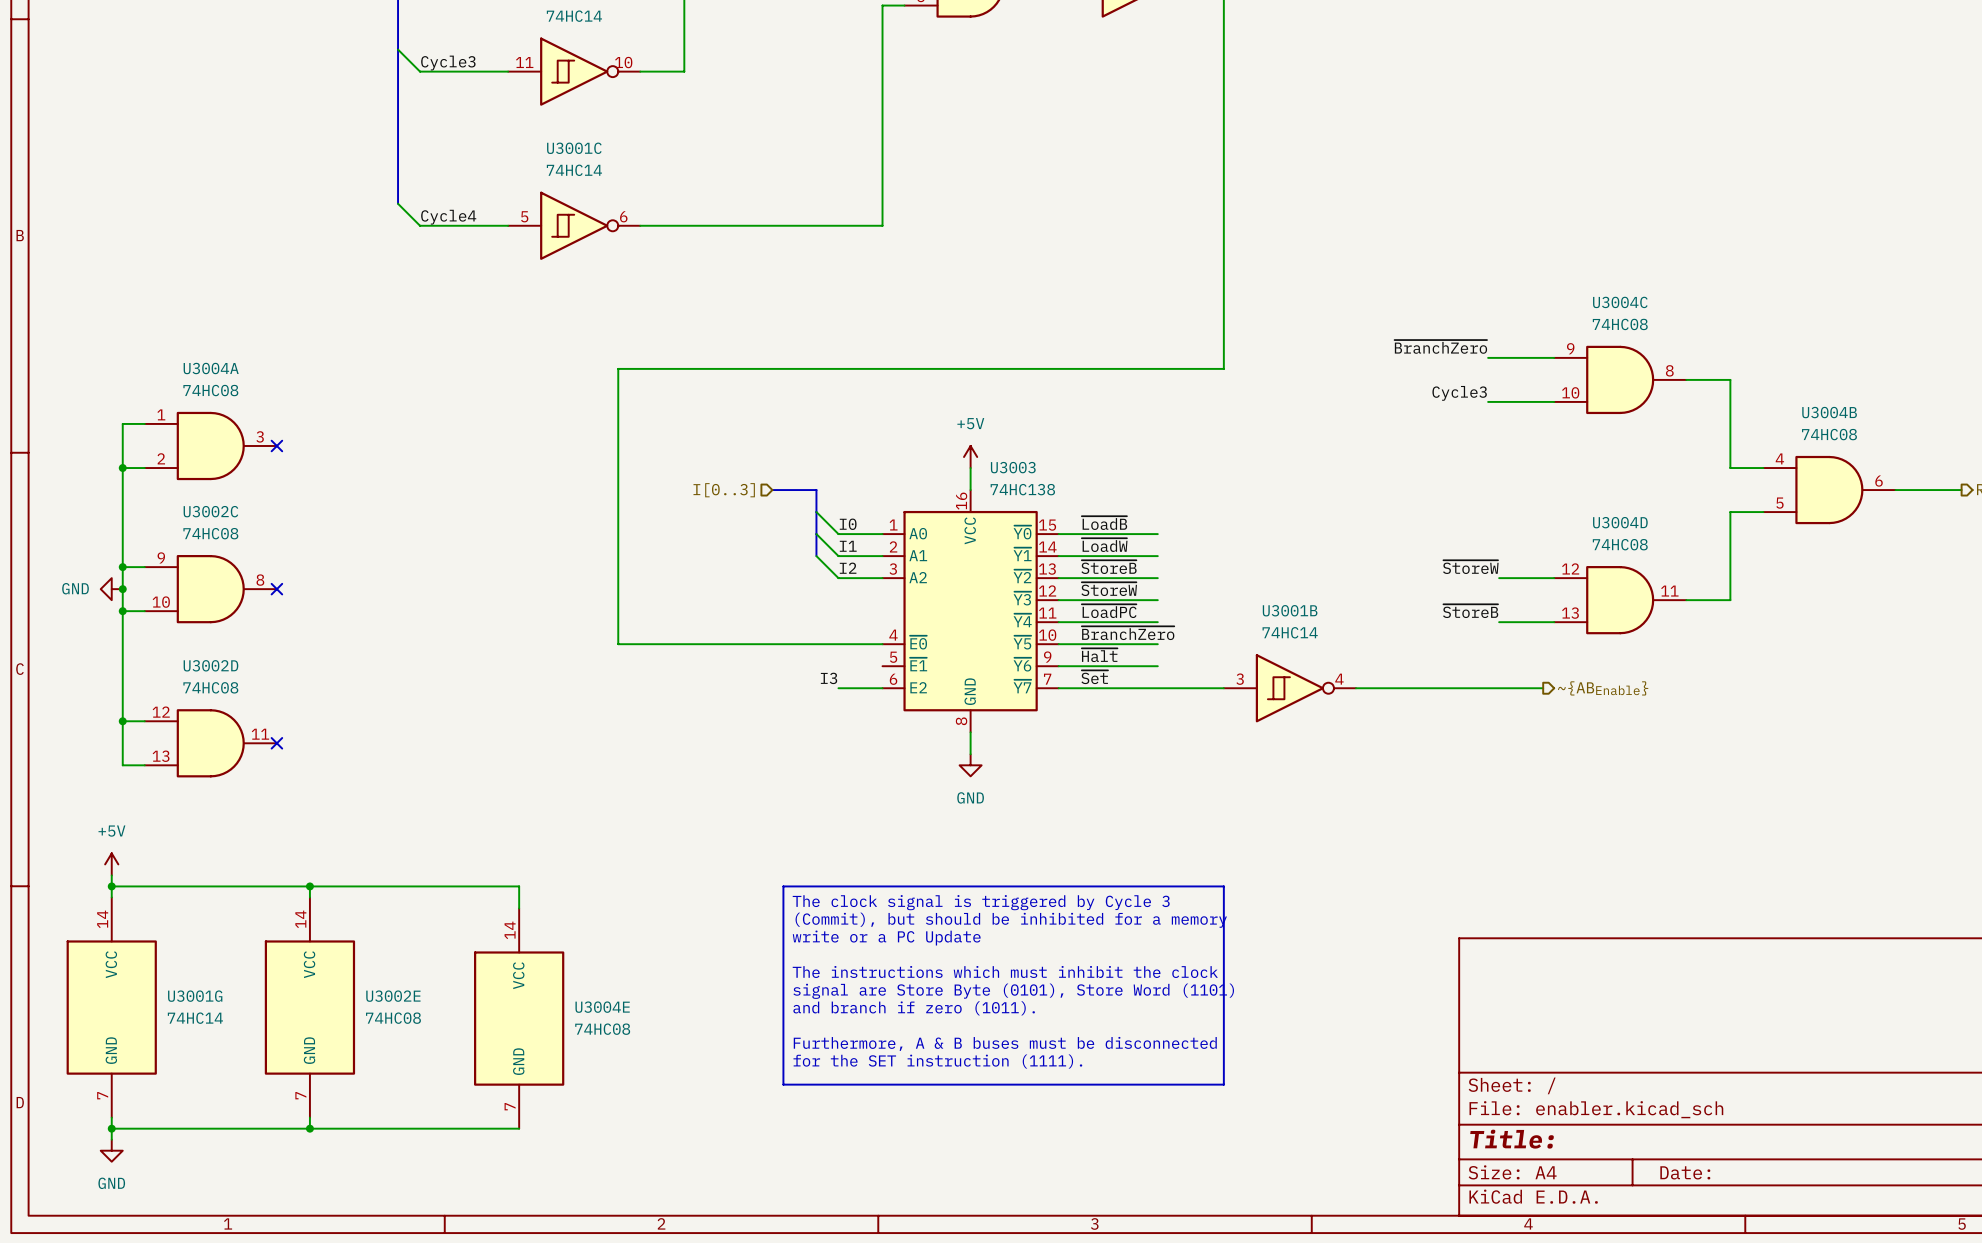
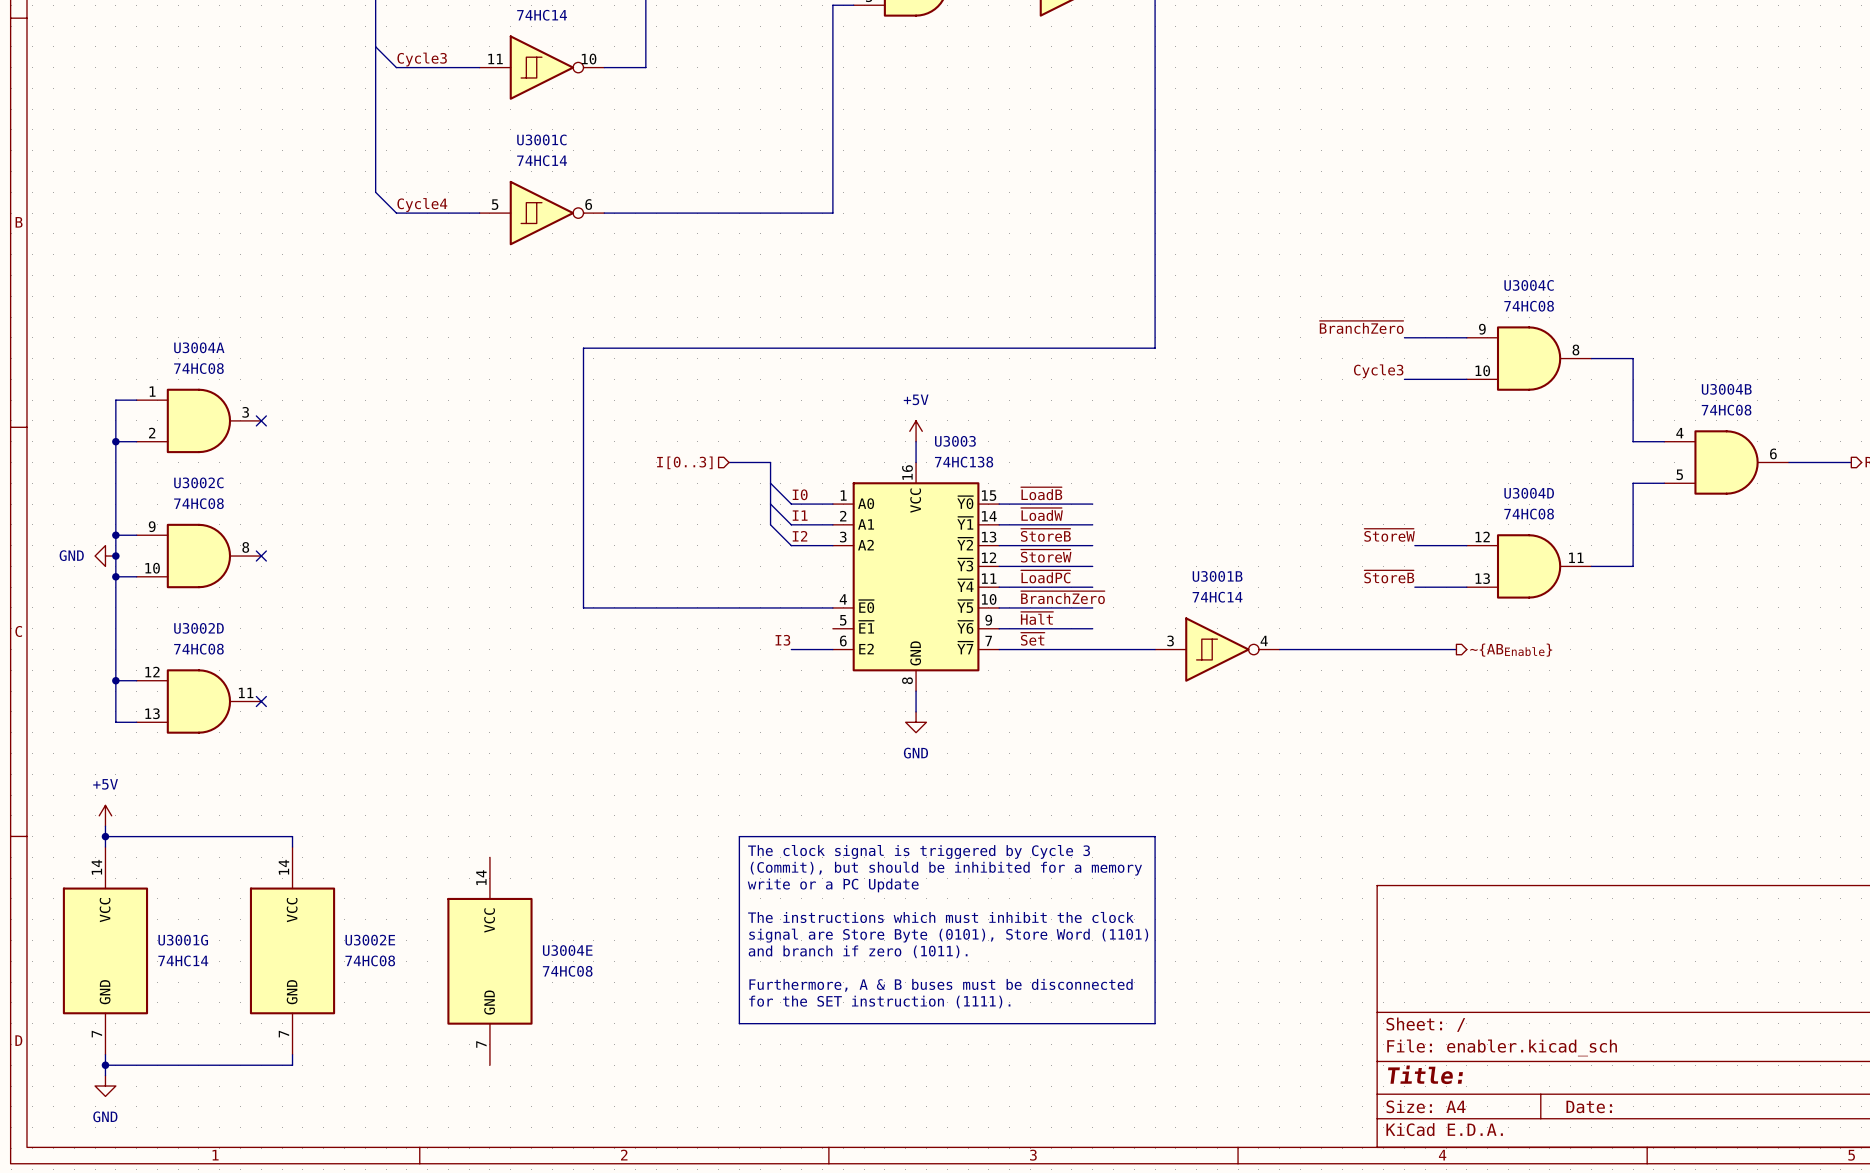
wire: (309, 886) (519, 886) (519, 908) -> none
junction: (309, 886) -> none
wire: (309, 1128) (519, 1128) -> none
junction: (309, 1128) -> none

